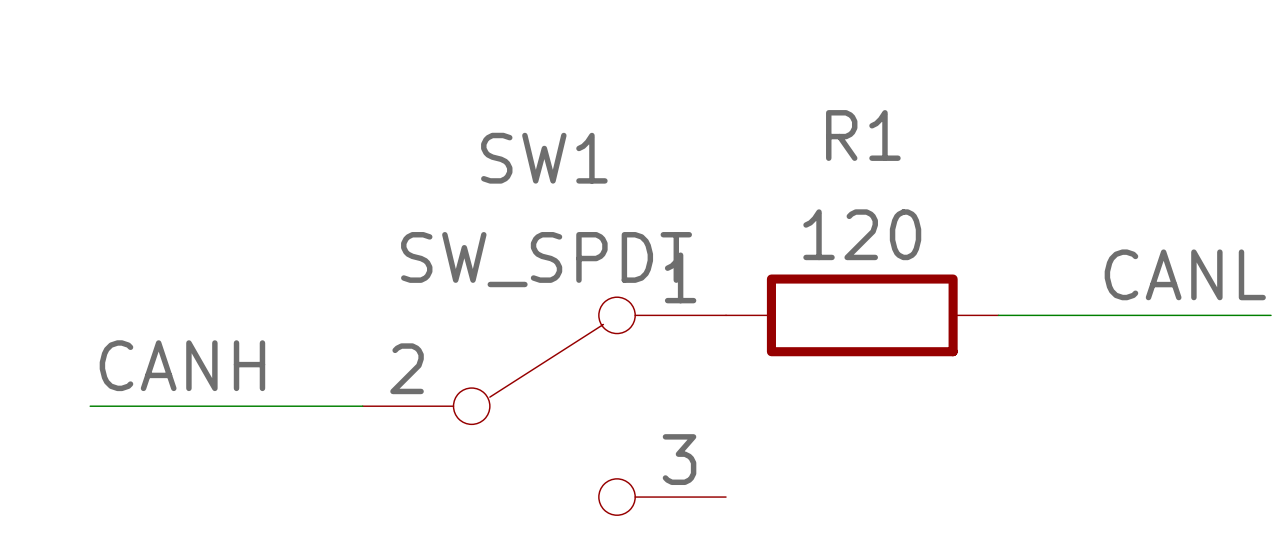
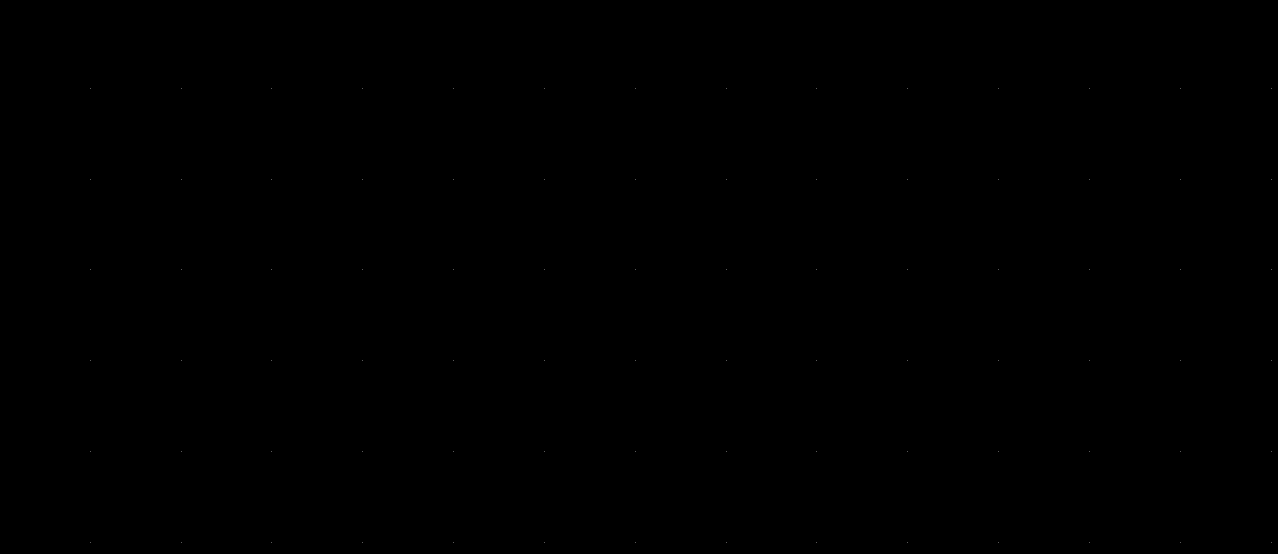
label: CANL (1185, 274) -> none
R1: 120 (862, 315) -> none
wire: (998, 315) (1271, 315) -> none
label: CANH (182, 365) -> none
wire: (90, 406) (362, 406) -> none
SW1: SW_SPDT (544, 406) -> none

